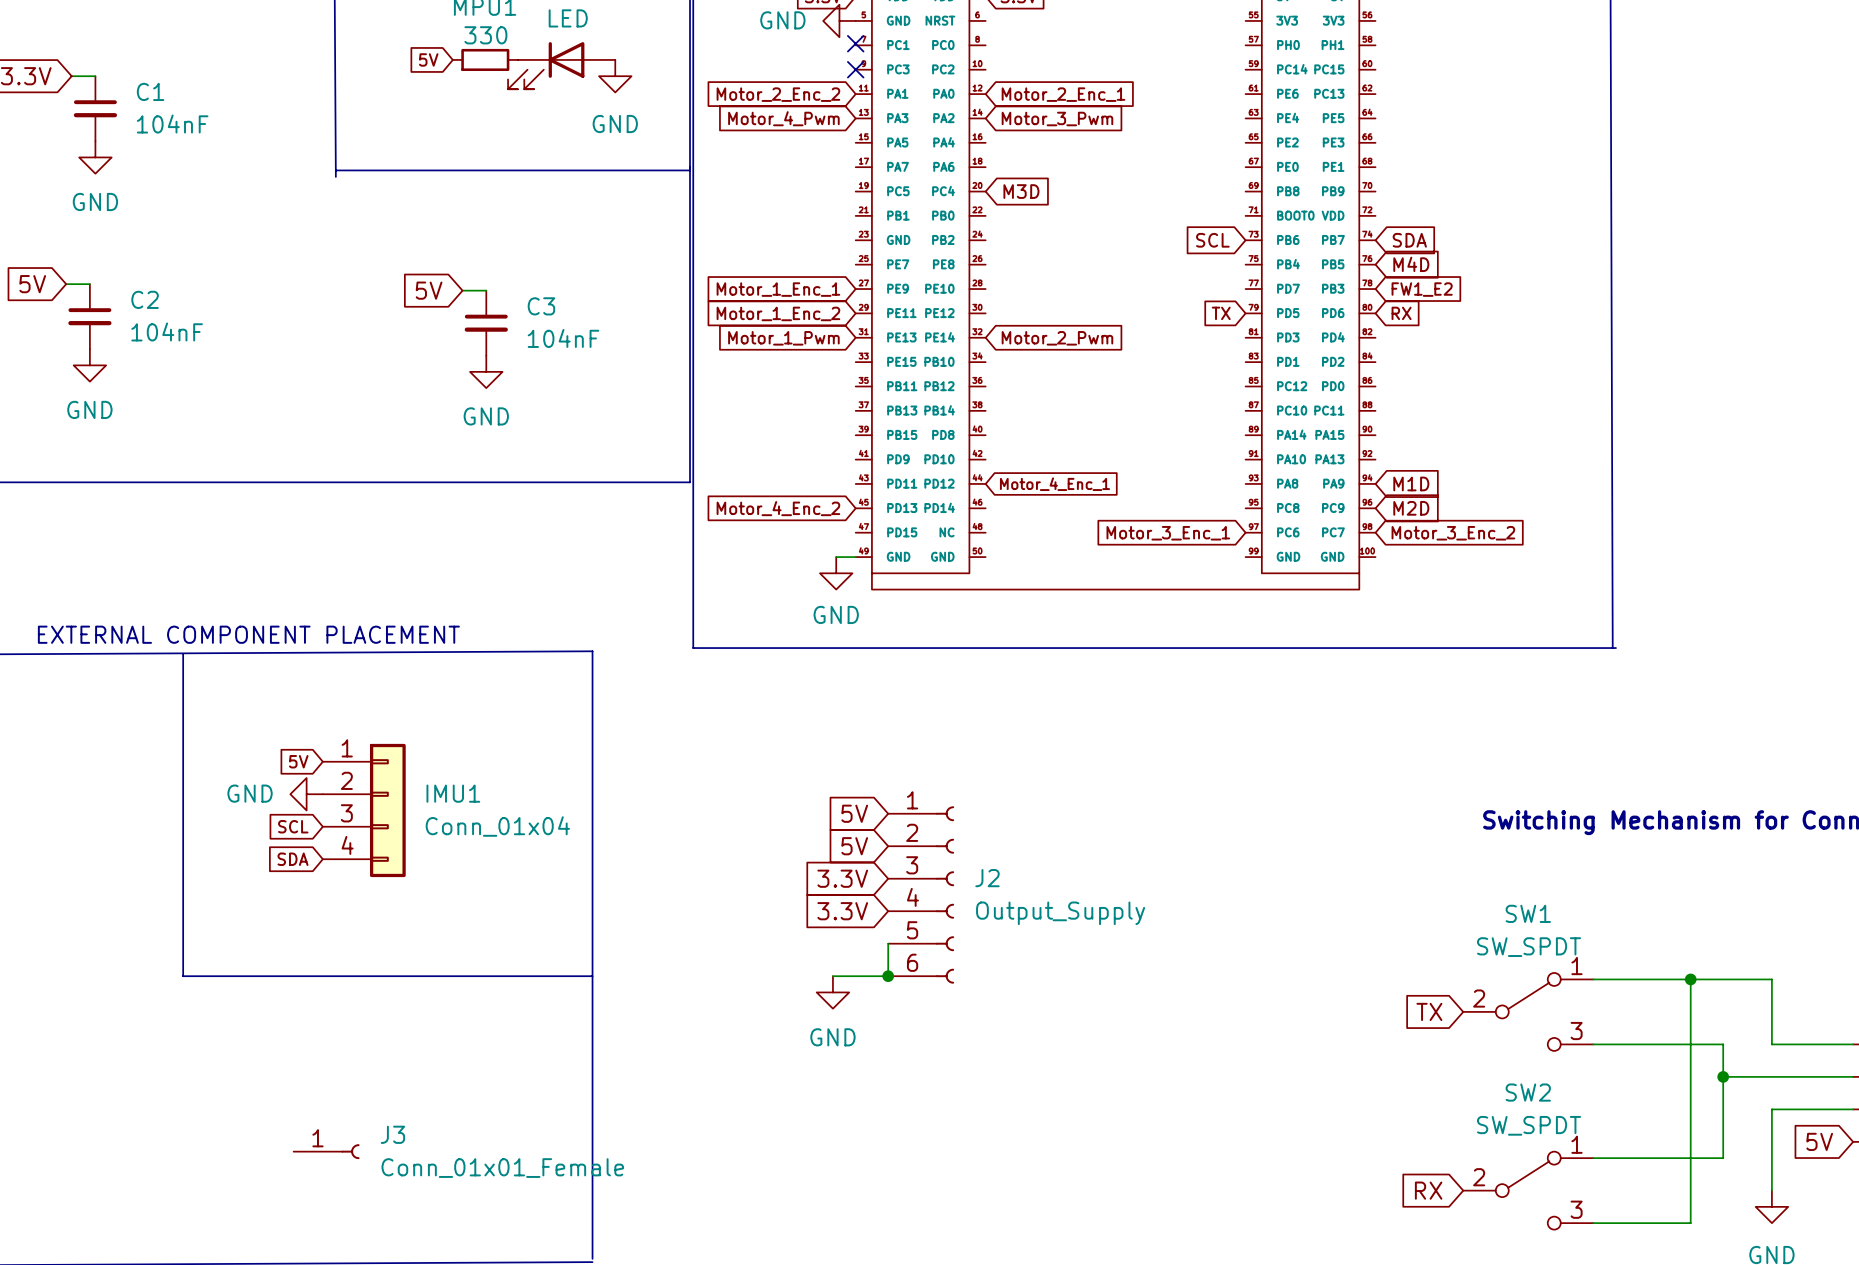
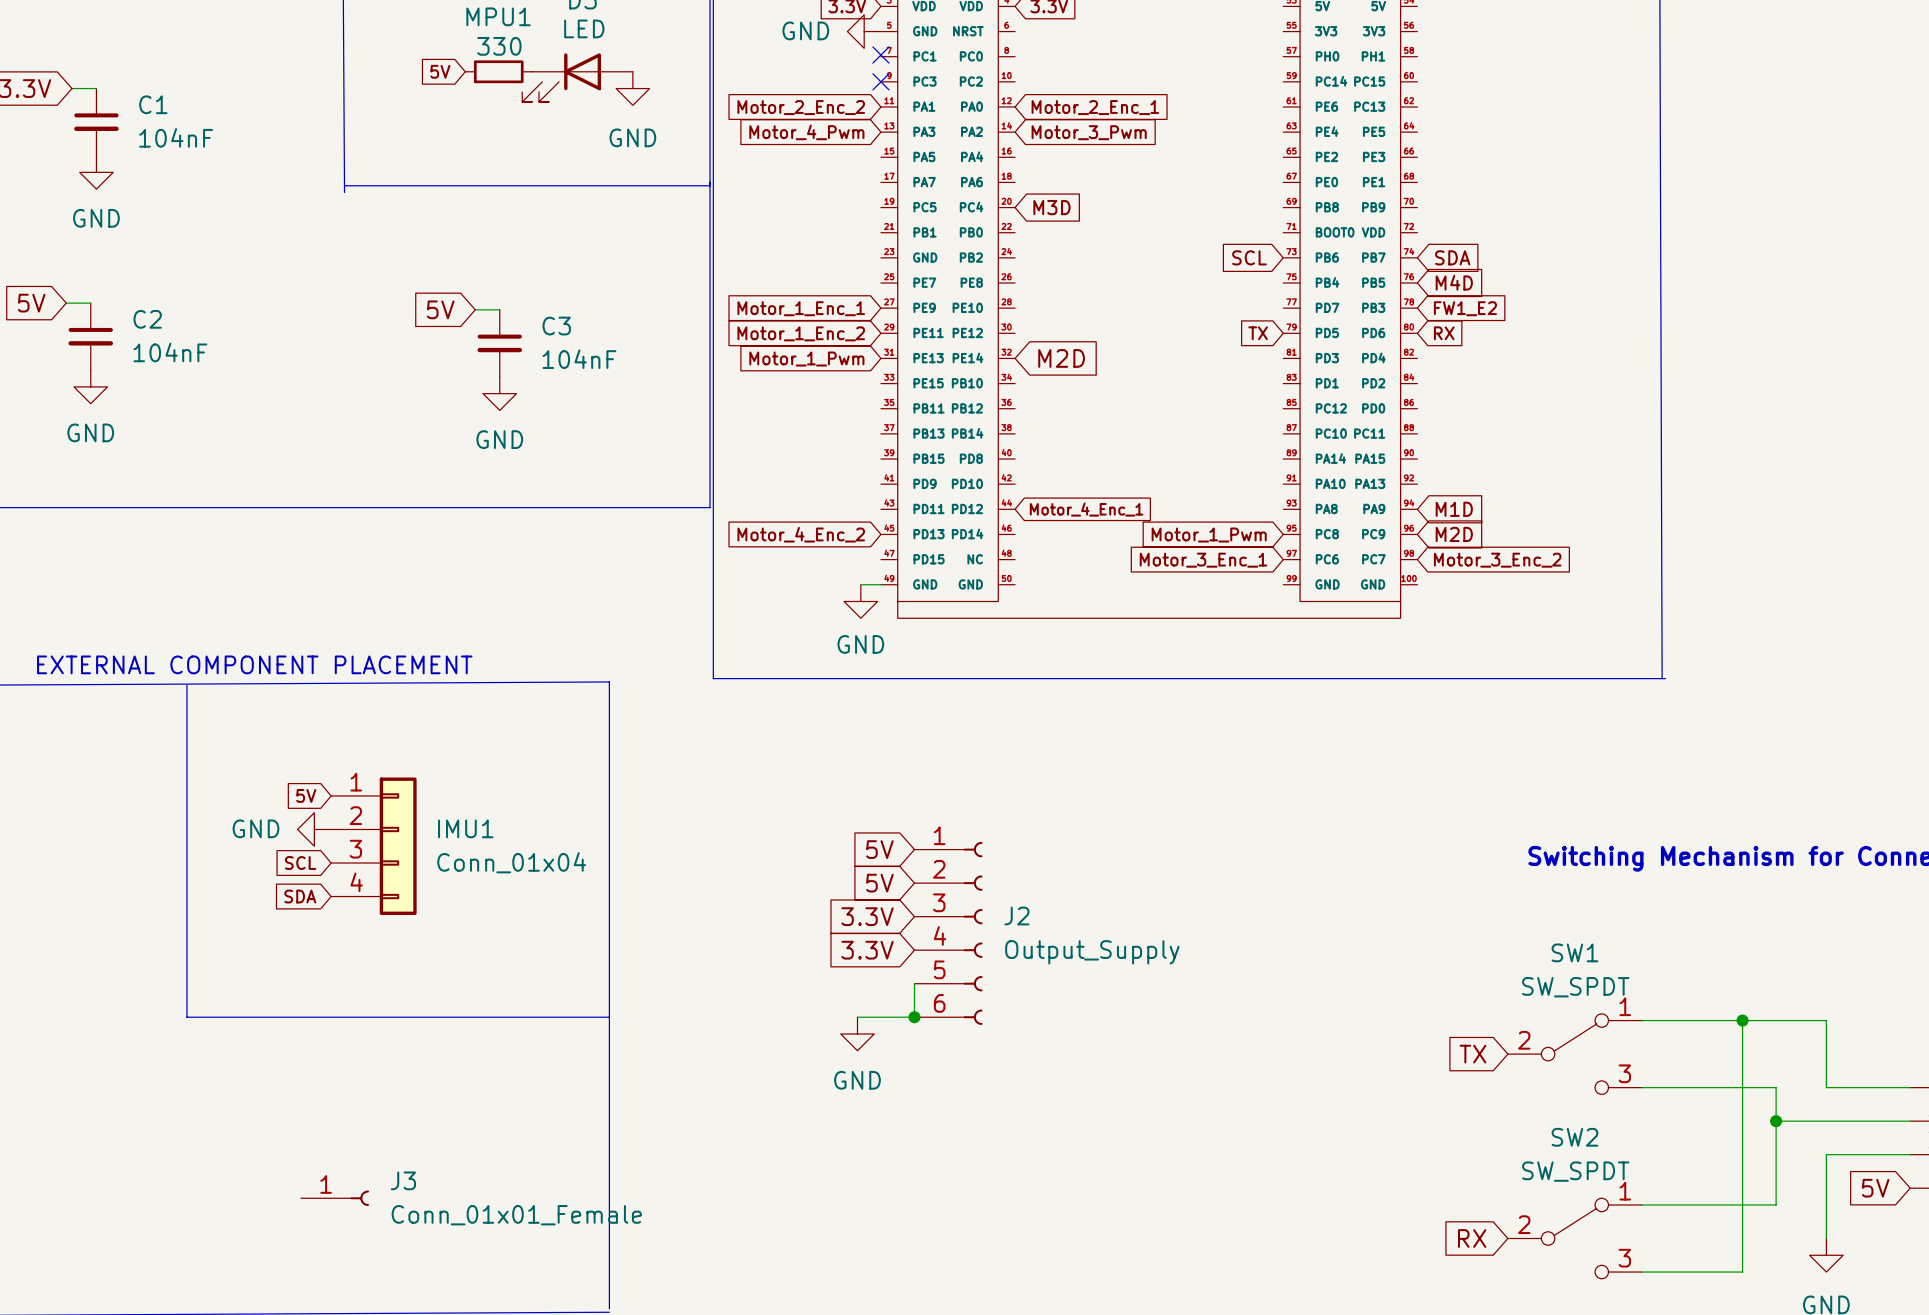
global label: Motor_2_Pwm (1057, 338) -> M2D (1061, 358)
global label: none -> Motor_1_Pwm (1209, 535)

